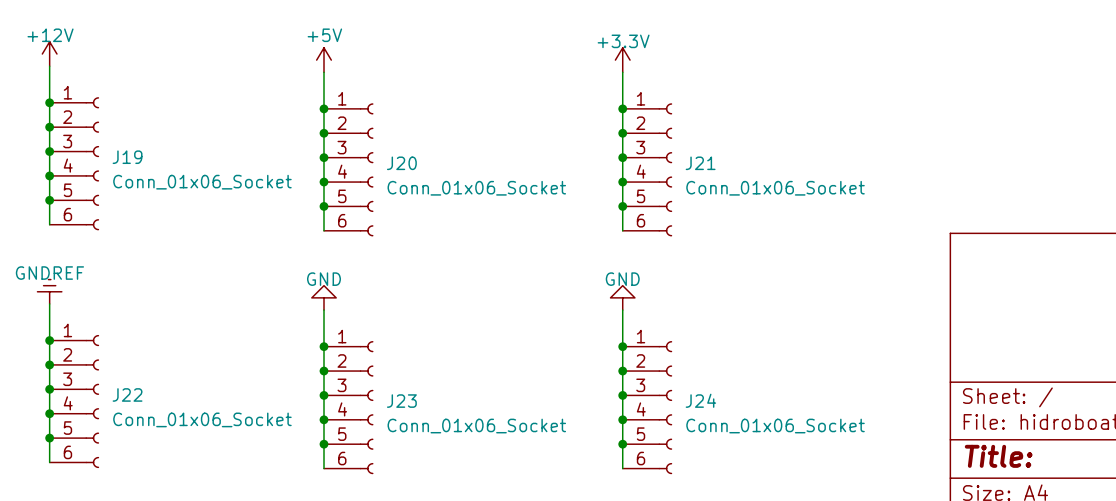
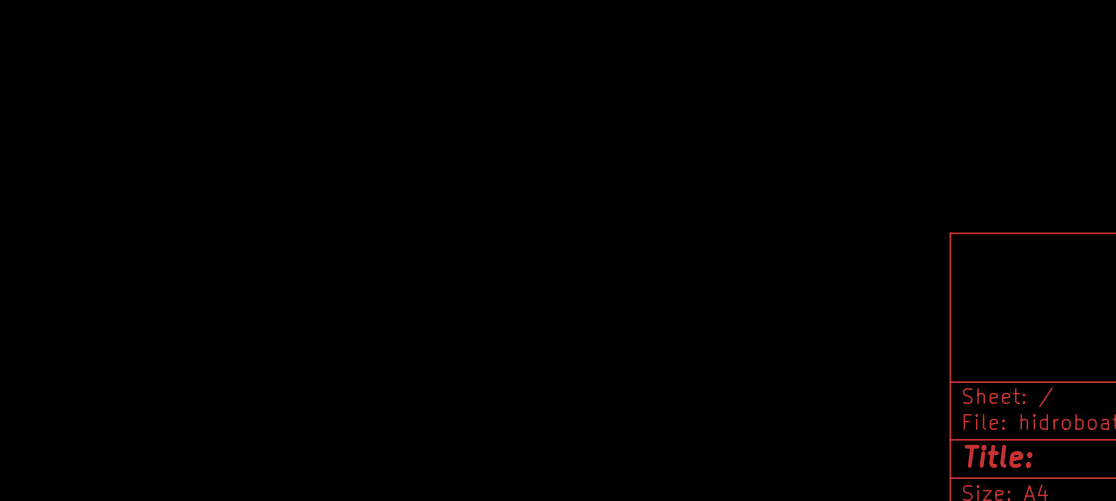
power symbol: +12V (49, 54) -> none
power symbol: +5V (323, 60) -> none
power symbol: +3.3V (622, 60) -> none
wire: (49, 66) (49, 224) -> none
wire: (323, 72) (323, 230) -> none
wire: (622, 72) (622, 230) -> none
junction: (49, 102) -> none
junction: (323, 108) -> none
junction: (622, 108) -> none
junction: (49, 127) -> none
junction: (323, 133) -> none
junction: (622, 133) -> none
junction: (49, 151) -> none
junction: (323, 157) -> none
junction: (622, 157) -> none
J19: Conn_01x06_Socket (74, 163) -> none
J20: Conn_01x06_Socket (348, 169) -> none
J21: Conn_01x06_Socket (647, 169) -> none
junction: (49, 175) -> none
junction: (323, 182) -> none
junction: (622, 182) -> none
junction: (49, 200) -> none
junction: (323, 206) -> none
junction: (622, 206) -> none
power symbol: GNDREF (49, 291) -> none
power symbol: GND (323, 297) -> none
power symbol: GND (622, 297) -> none
wire: (49, 303) (49, 462) -> none
wire: (323, 310) (323, 468) -> none
wire: (622, 310) (622, 468) -> none
junction: (49, 340) -> none
junction: (323, 346) -> none
junction: (622, 346) -> none
junction: (49, 364) -> none
junction: (323, 371) -> none
junction: (622, 371) -> none
junction: (49, 389) -> none
junction: (323, 395) -> none
junction: (622, 395) -> none
J22: Conn_01x06_Socket (74, 401) -> none
J23: Conn_01x06_Socket (348, 407) -> none
J24: Conn_01x06_Socket (647, 407) -> none
junction: (49, 413) -> none
junction: (323, 419) -> none
junction: (622, 419) -> none
junction: (49, 438) -> none
junction: (323, 444) -> none
junction: (622, 444) -> none

